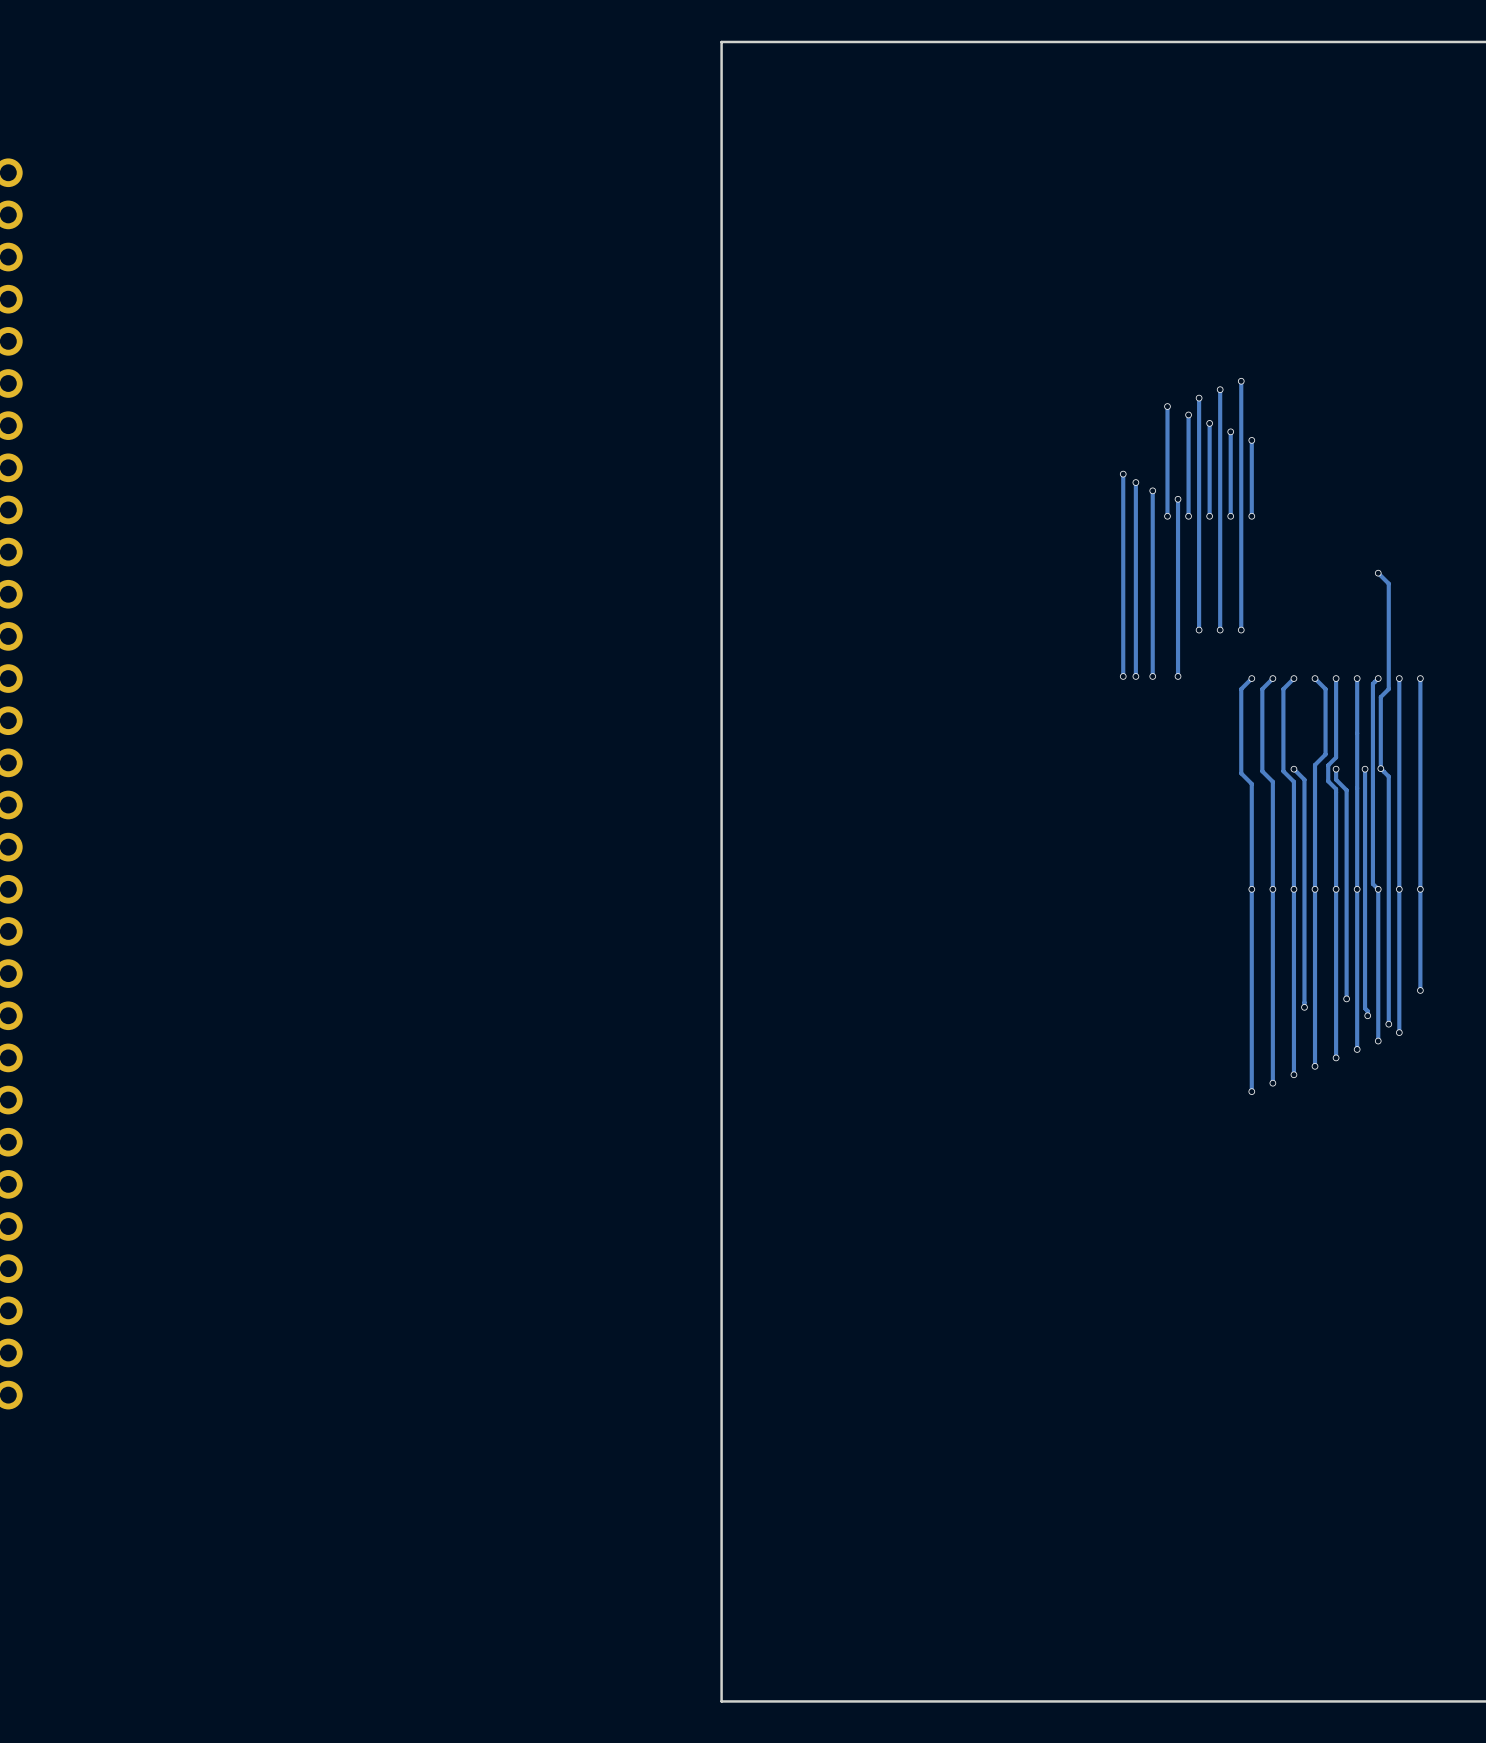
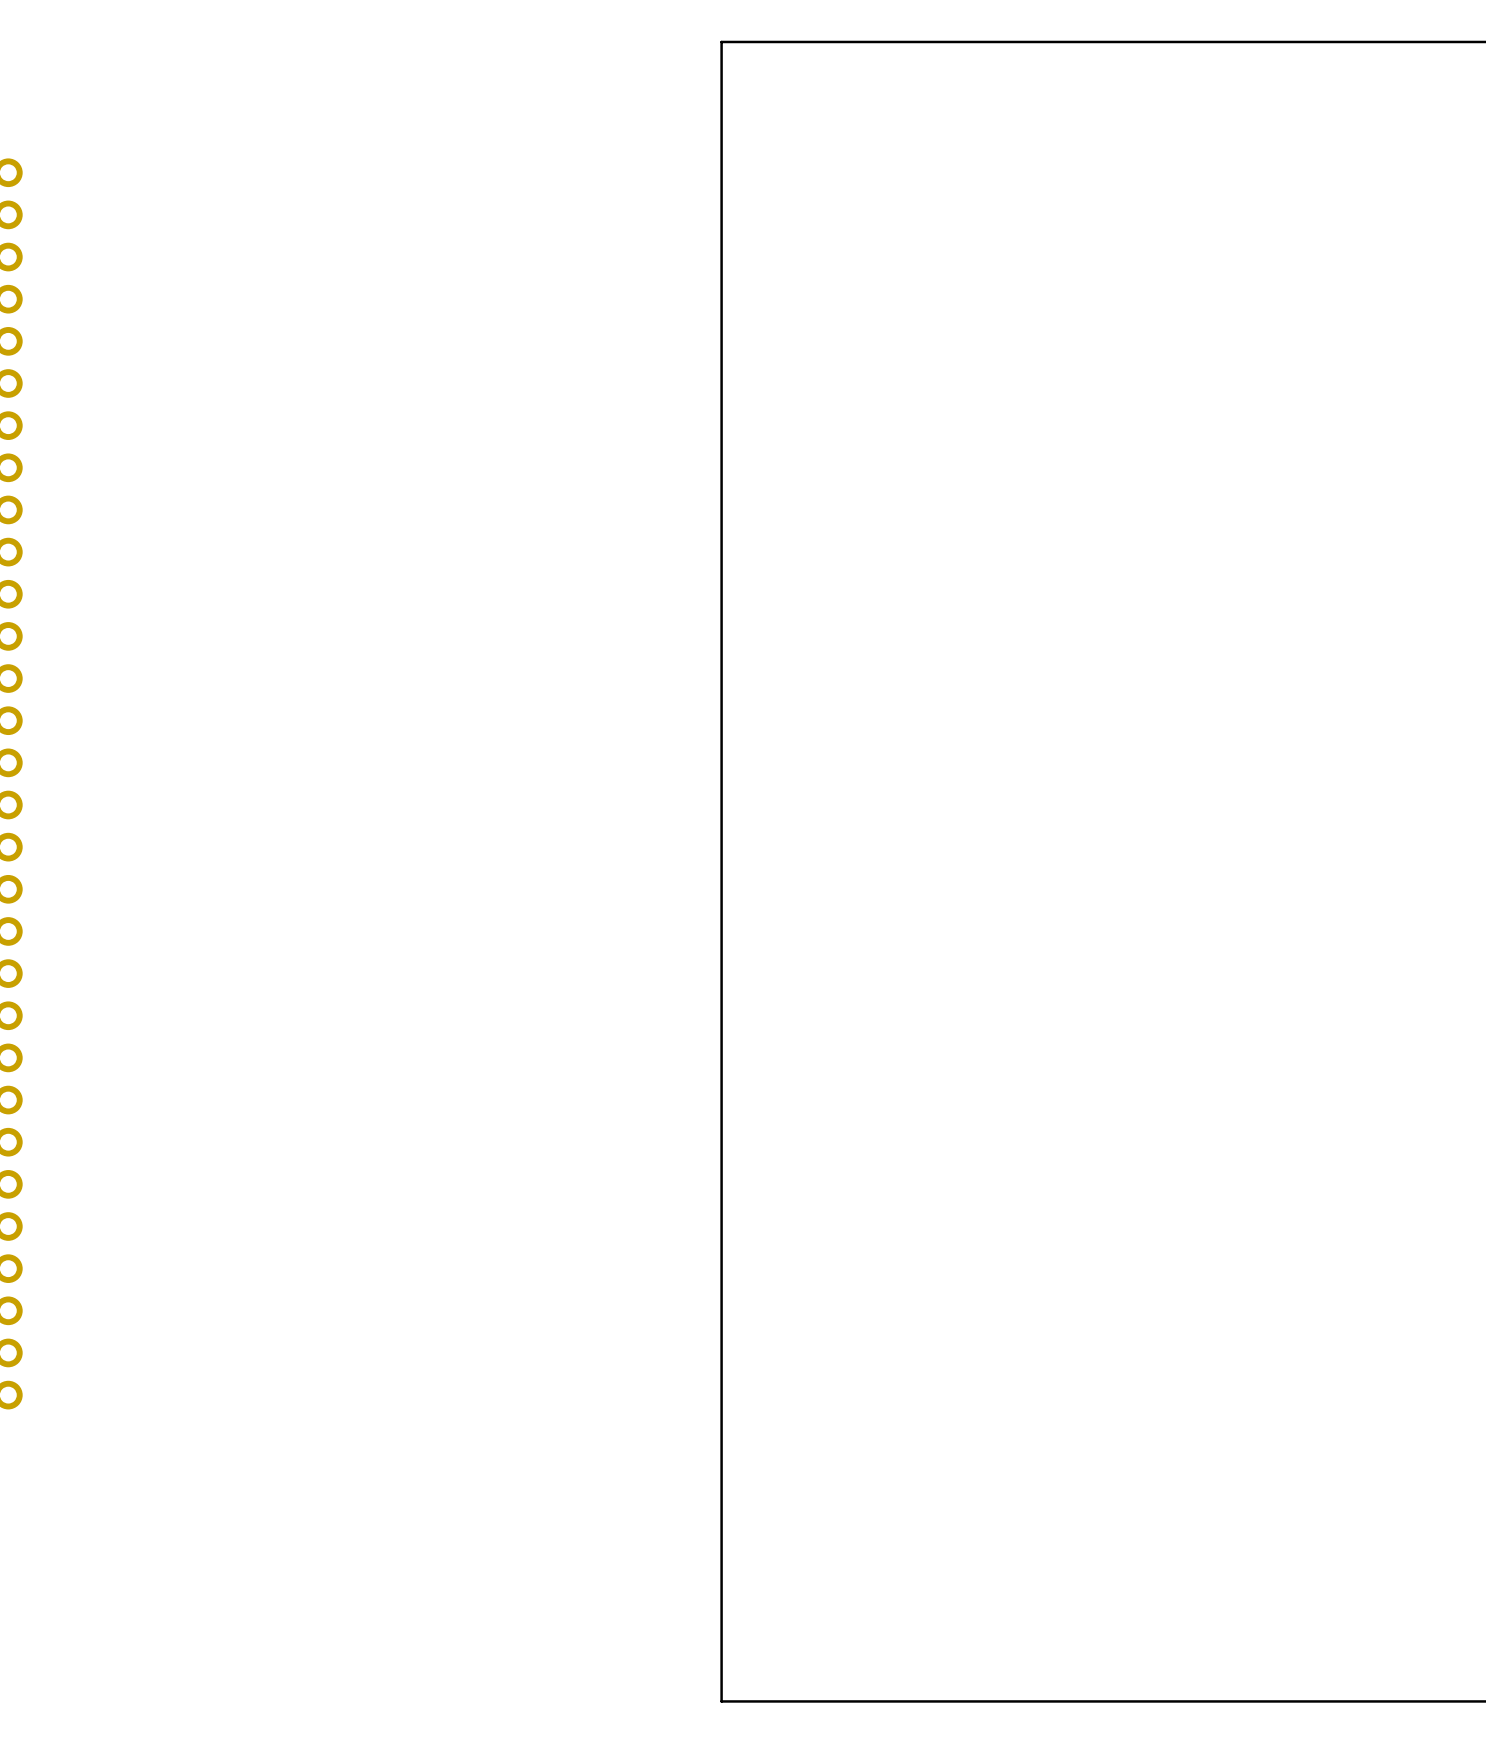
track: (1241, 381) (1241, 630) -> none
via: (1241, 381) -> none
track: (1220, 389) (1220, 630) -> none
via: (1220, 389) -> none
track: (1199, 398) (1199, 630) -> none
via: (1199, 398) -> none
track: (1167, 406) (1167, 516) -> none
via: (1167, 406) -> none
track: (1188, 414) (1188, 516) -> none
via: (1188, 414) -> none
track: (1209, 423) (1209, 516) -> none
via: (1209, 423) -> none
track: (1230, 431) (1230, 516) -> none
via: (1230, 431) -> none
track: (1251, 440) (1251, 516) -> none
via: (1251, 440) -> none
track: (1123, 474) (1123, 676) -> none
via: (1123, 474) -> none
track: (1135, 482) (1135, 676) -> none
via: (1135, 482) -> none
track: (1152, 490) (1152, 676) -> none
via: (1152, 490) -> none
track: (1178, 499) (1178, 676) -> none
via: (1178, 499) -> none
via: (1167, 516) -> none
via: (1188, 516) -> none
via: (1209, 516) -> none
via: (1230, 516) -> none
via: (1251, 516) -> none
track: (1378, 573) (1388, 583) (1388, 689) (1380, 697) (1380, 768) (1388, 776) (1388, 1024) -> none
via: (1378, 573) -> none
via: (1199, 630) -> none
via: (1220, 630) -> none
via: (1241, 630) -> none
via: (1123, 676) -> none
via: (1135, 676) -> none
via: (1152, 676) -> none
via: (1178, 676) -> none
track: (1251, 678) (1241, 689) (1241, 773) (1251, 783) (1251, 1091) -> none
via: (1251, 678) -> none
track: (1272, 678) (1262, 689) (1262, 771) (1272, 781) (1272, 1083) -> none
via: (1272, 678) -> none
track: (1293, 678) (1283, 689) (1283, 771) (1293, 781) (1293, 1074) -> none
via: (1293, 678) -> none
track: (1315, 678) (1325, 689) (1325, 754) (1315, 764) (1315, 1066) -> none
via: (1315, 678) -> none
track: (1336, 678) (1336, 757) (1328, 765) (1328, 781) (1336, 789) (1336, 1057) -> none
via: (1336, 678) -> none
track: (1357, 678) (1357, 1049) -> none
via: (1357, 678) -> none
track: (1378, 678) (1372, 683) (1372, 883) (1378, 889) (1378, 1041) -> none
via: (1378, 678) -> none
track: (1399, 678) (1399, 1032) -> none
via: (1399, 678) -> none
track: (1420, 678) (1420, 990) -> none
via: (1420, 678) -> none
via: (1380, 768) -> none
track: (1293, 769) (1304, 779) (1304, 1007) -> none
via: (1293, 769) -> none
track: (1336, 769) (1336, 779) (1346, 790) (1346, 998) -> none
via: (1336, 769) -> none
track: (1365, 769) (1365, 1008) (1367, 1011) (1367, 1015) -> none
via: (1365, 769) -> none
via: (1251, 889) -> none
via: (1272, 889) -> none
via: (1293, 889) -> none
via: (1315, 889) -> none
via: (1336, 889) -> none
via: (1357, 889) -> none
via: (1378, 889) -> none
via: (1399, 889) -> none
via: (1420, 889) -> none
via: (1420, 990) -> none
via: (1346, 998) -> none
via: (1304, 1007) -> none
via: (1367, 1015) -> none
via: (1388, 1024) -> none
via: (1399, 1032) -> none
via: (1378, 1041) -> none
via: (1357, 1049) -> none
via: (1336, 1057) -> none
via: (1315, 1066) -> none
via: (1293, 1074) -> none
via: (1272, 1083) -> none
via: (1251, 1091) -> none

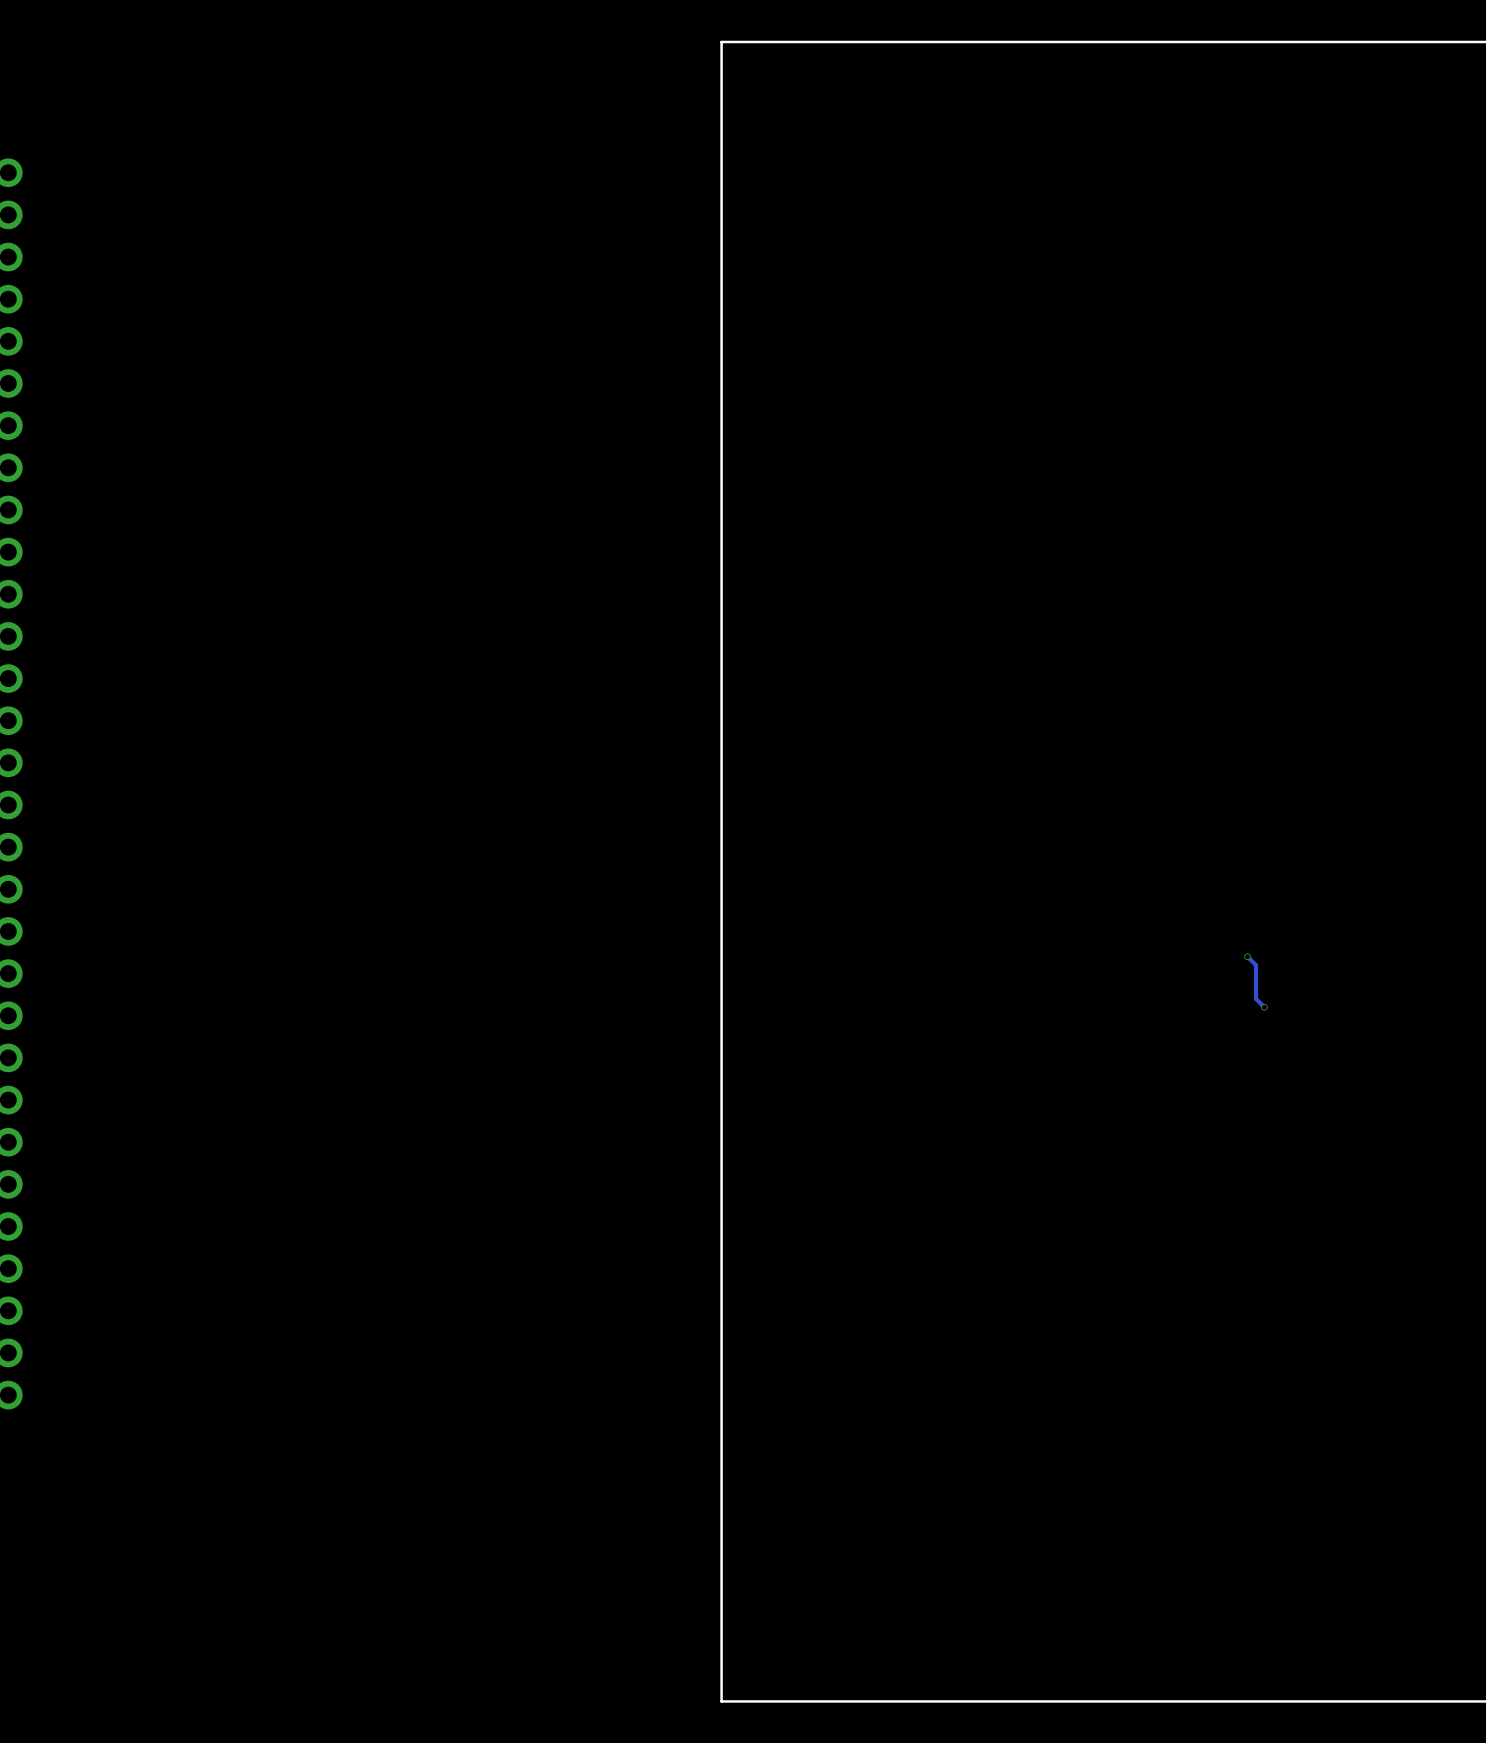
track: none -> (1247, 956) (1256, 965) (1256, 998) (1264, 1007)
via: none -> (1247, 956)
via: none -> (1264, 1007)

